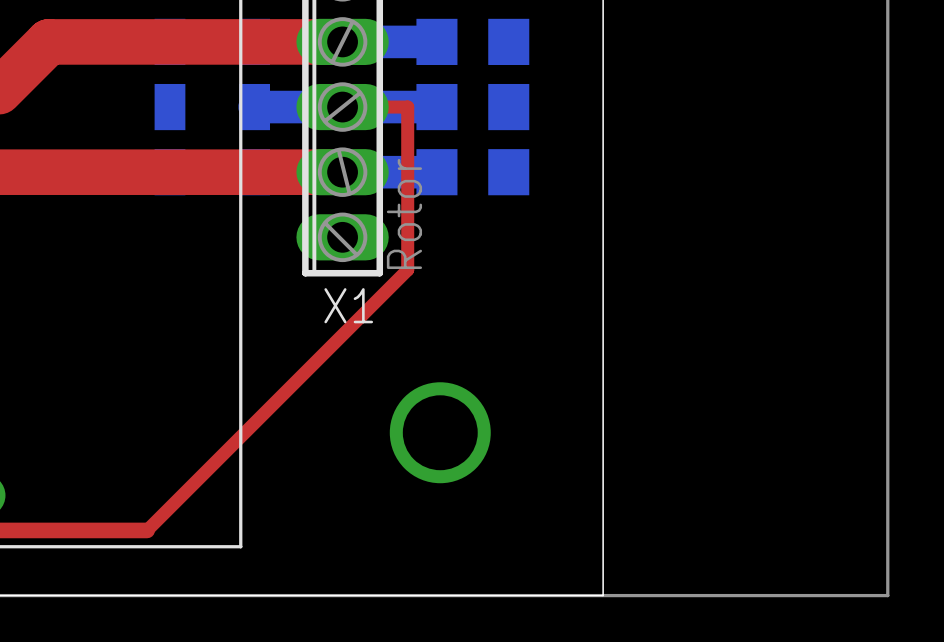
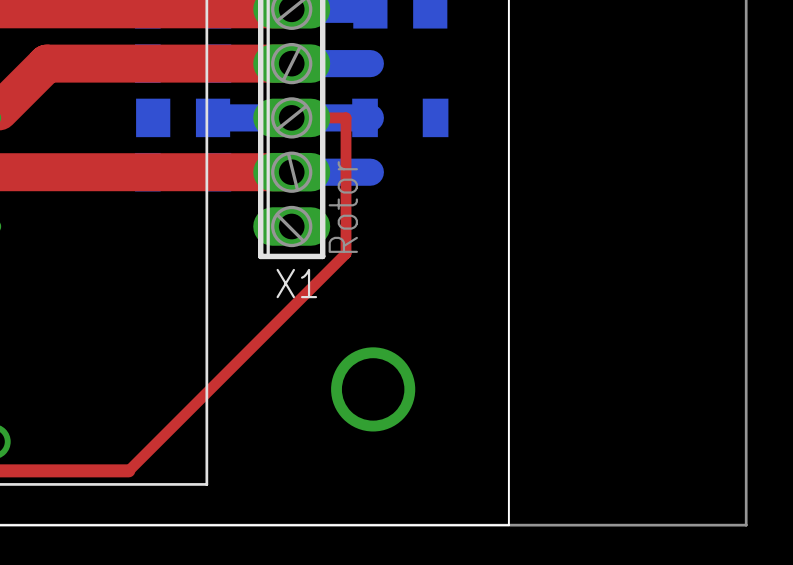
part: (472, 41) -> none
part footprint: [154, 83, 271, 131] -> [136, 98, 231, 138]
part footprint: [416, 83, 530, 131] -> [352, 98, 449, 138]
part: (472, 172) -> none

